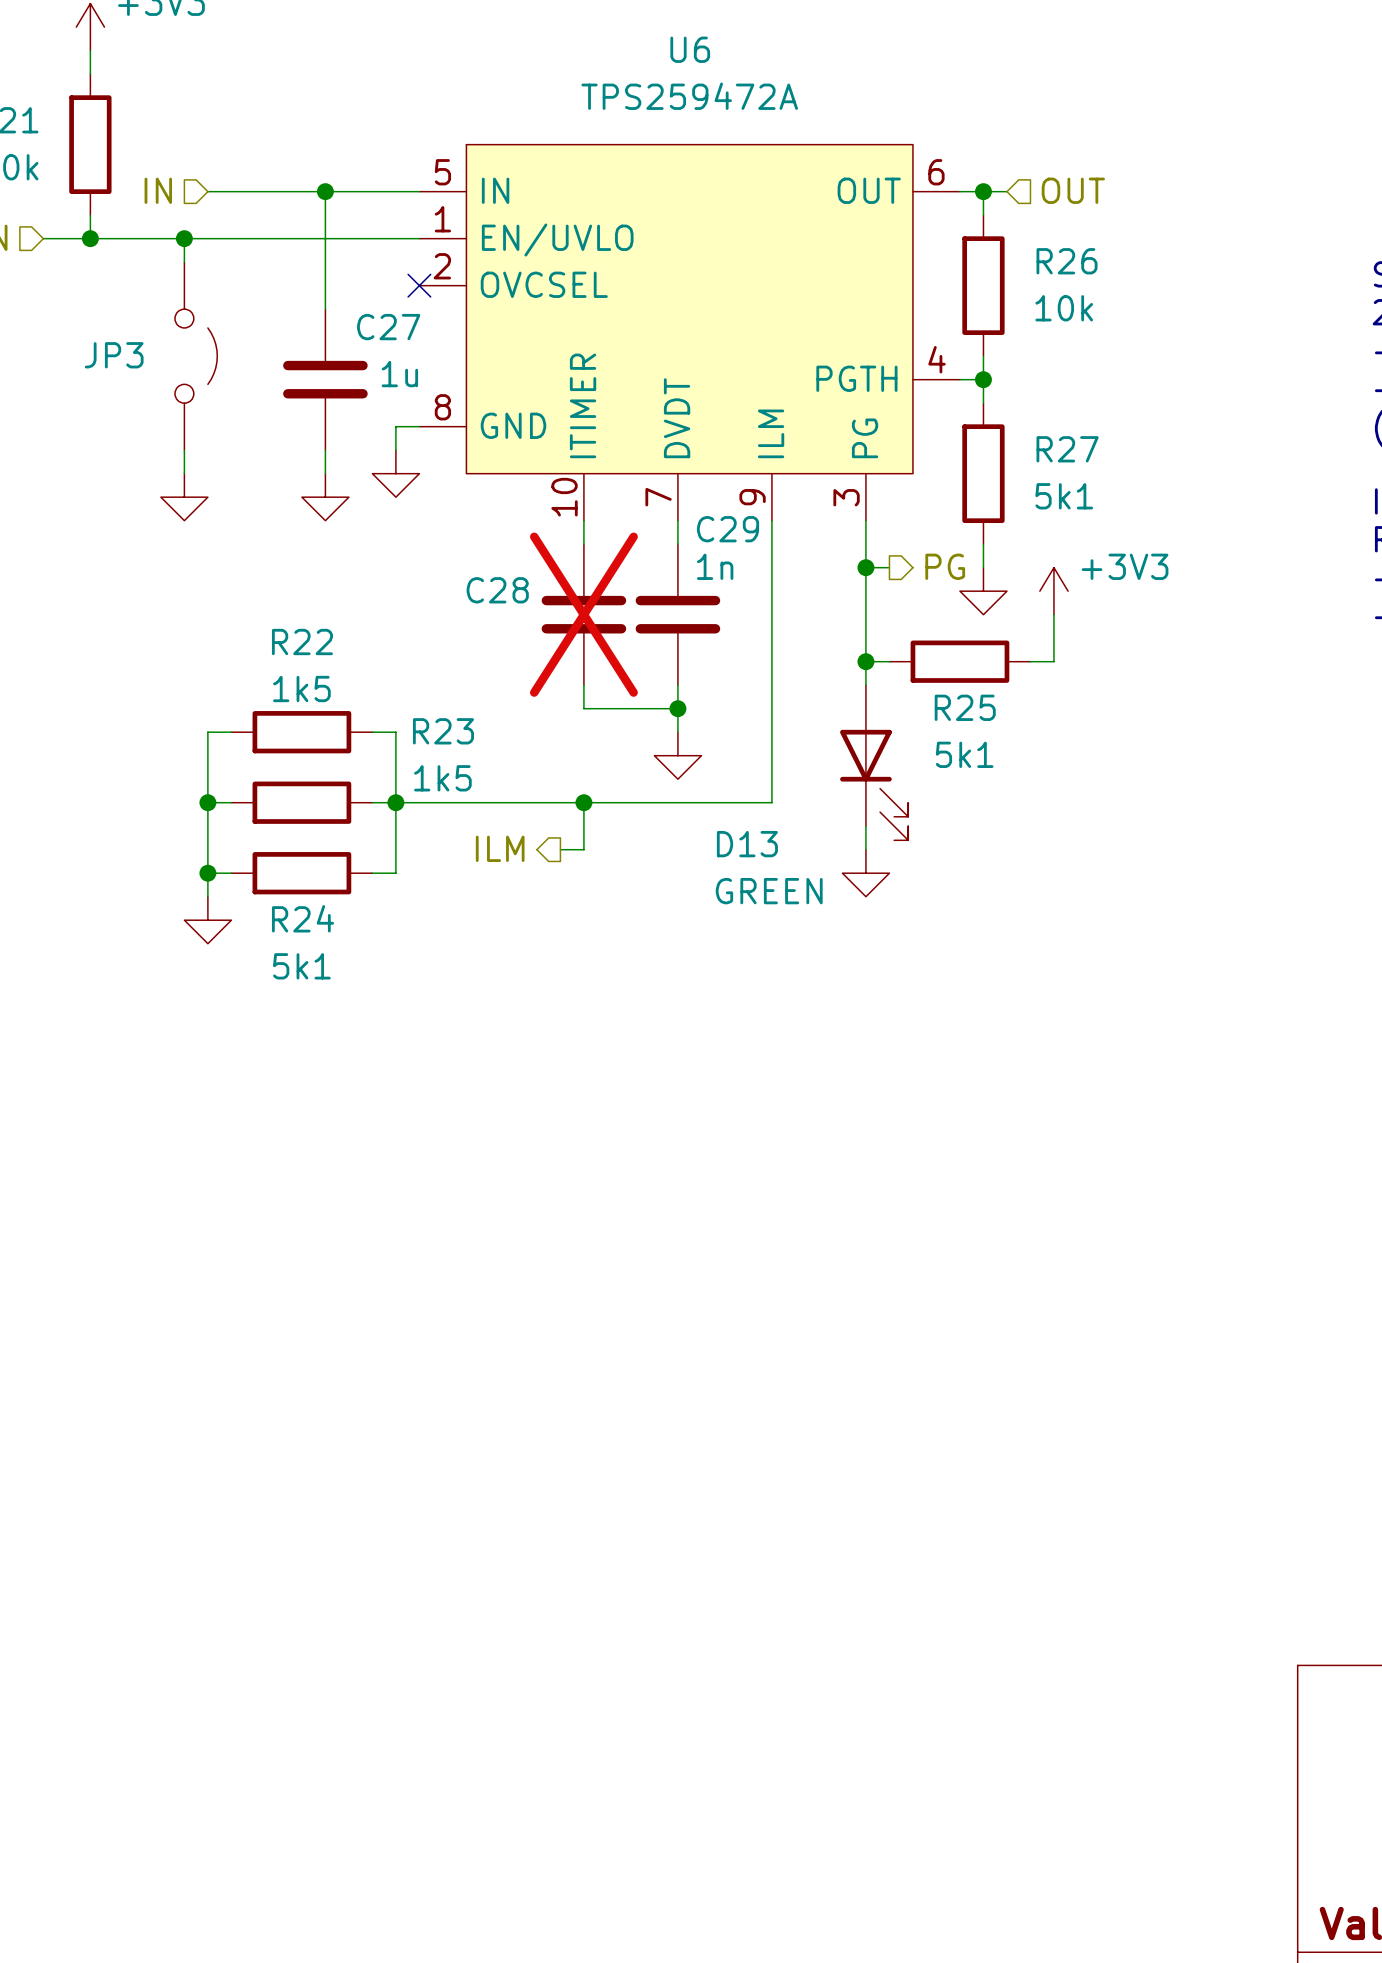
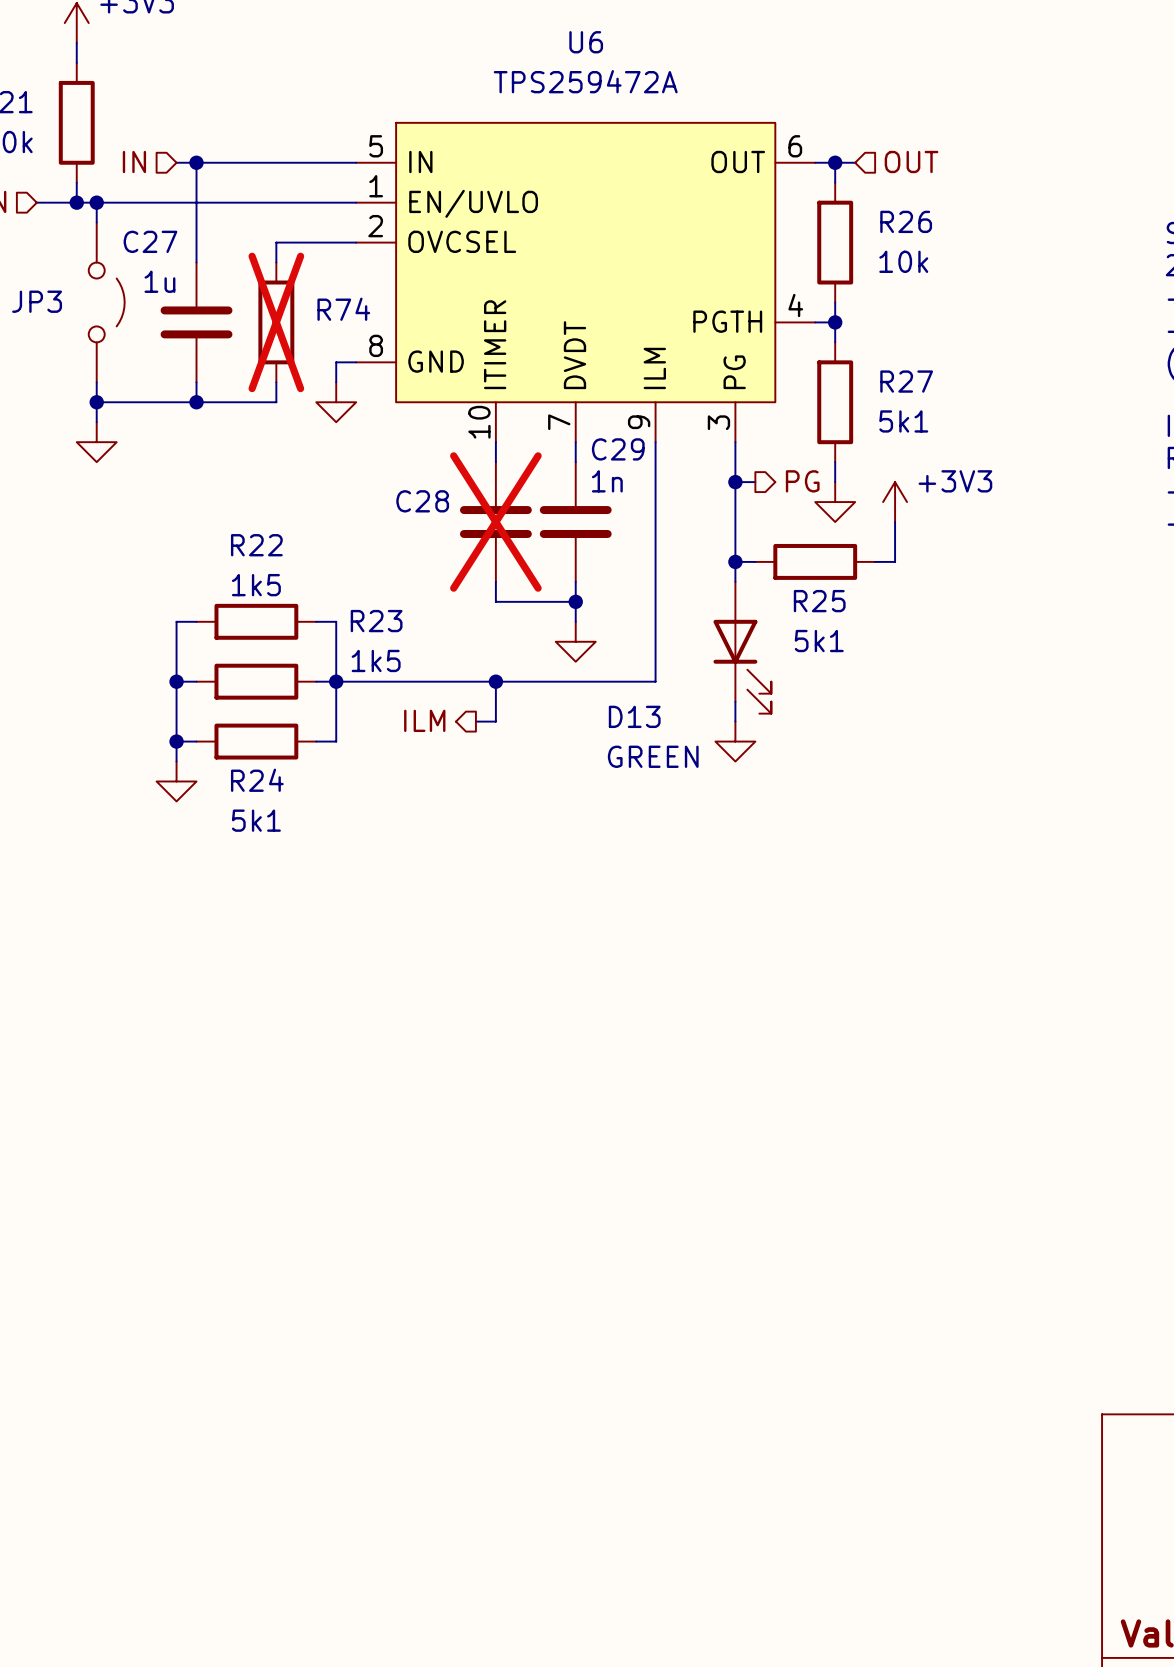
wire: none -> (196, 162) (196, 262)
junction: none -> (196, 162)
wire: (325, 191) (325, 285) -> (356, 242) (276, 242)
junction: (325, 191) -> none
junction: none -> (96, 202)
wire: (184, 238) (184, 262) -> (96, 202) (96, 222)
junction: (184, 238) -> none
no-connect mark: (419, 285) -> none
C27 name position: C27 (388, 327) -> C27 (150, 241)
JP3 position: (196, 356) -> (106, 302)
C27 value position: 1u (399, 374) -> 1u (159, 281)
C27 position: (325, 379) -> (196, 322)
R74: none -> (276, 322)
wire: none -> (96, 382) (96, 422)
wire: (184, 450) (184, 473) -> (196, 382) (196, 402)
wire: none -> (96, 402) (276, 402)
junction: none -> (96, 402)
junction: none -> (196, 402)
power symbol position: (184, 497) -> (96, 442)
power symbol: (325, 497) -> none

